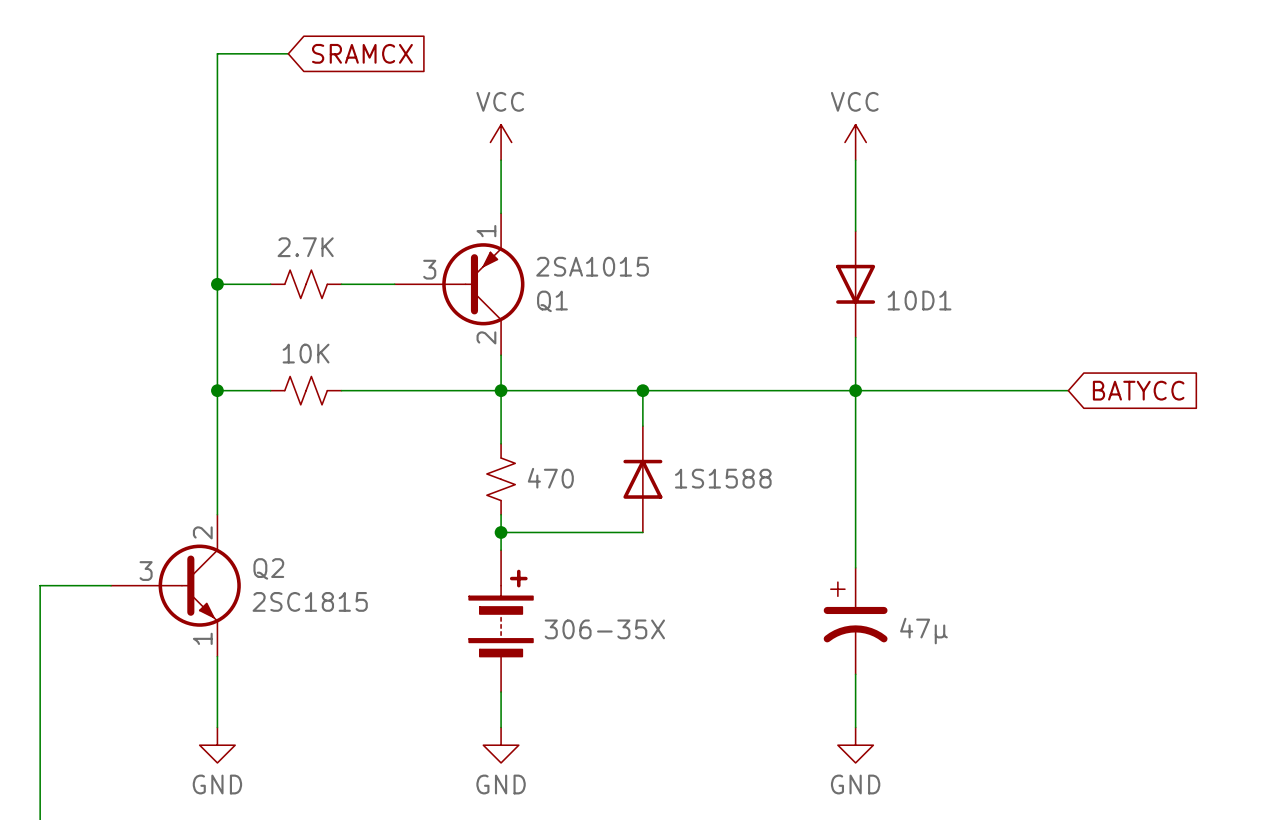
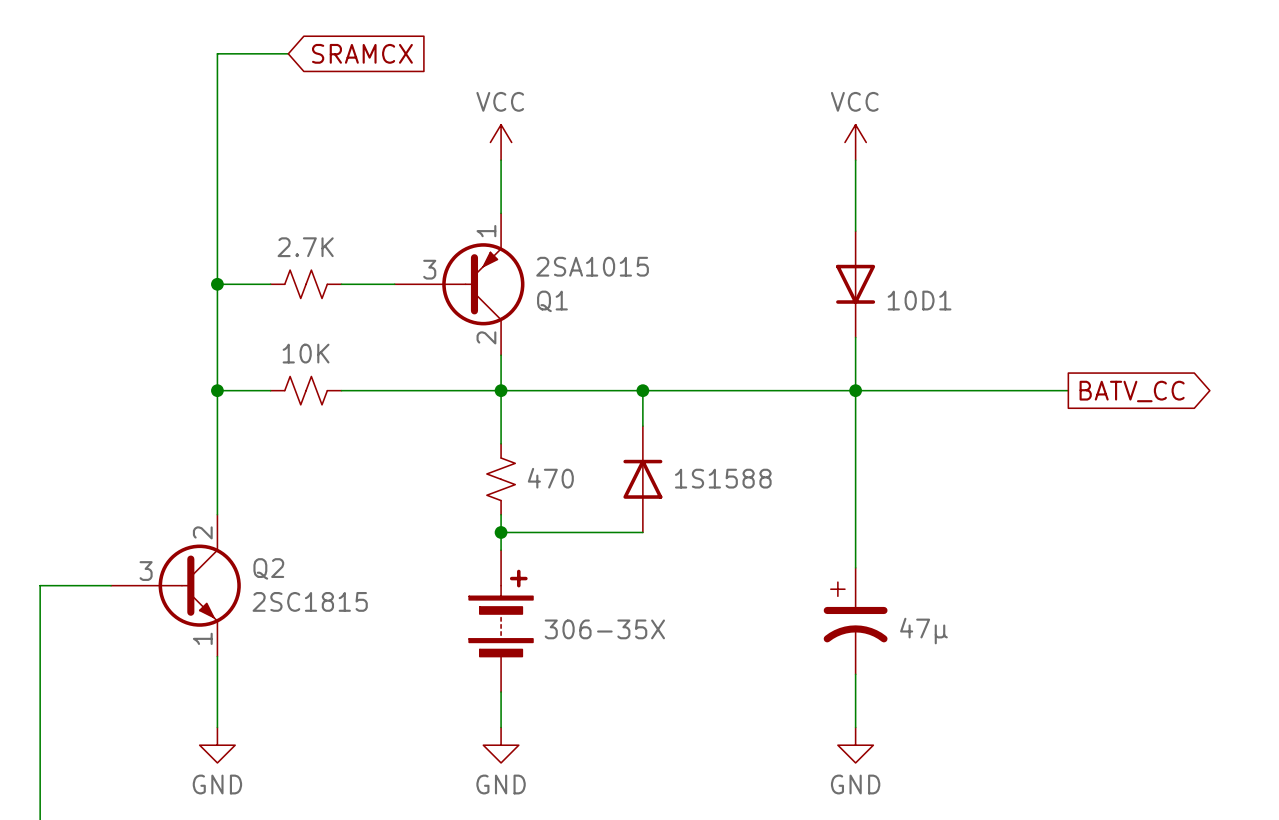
global label shape: input (1138, 390) -> output (1132, 391)
global label: BATYCC (1138, 390) -> BATV_CC (1132, 391)

